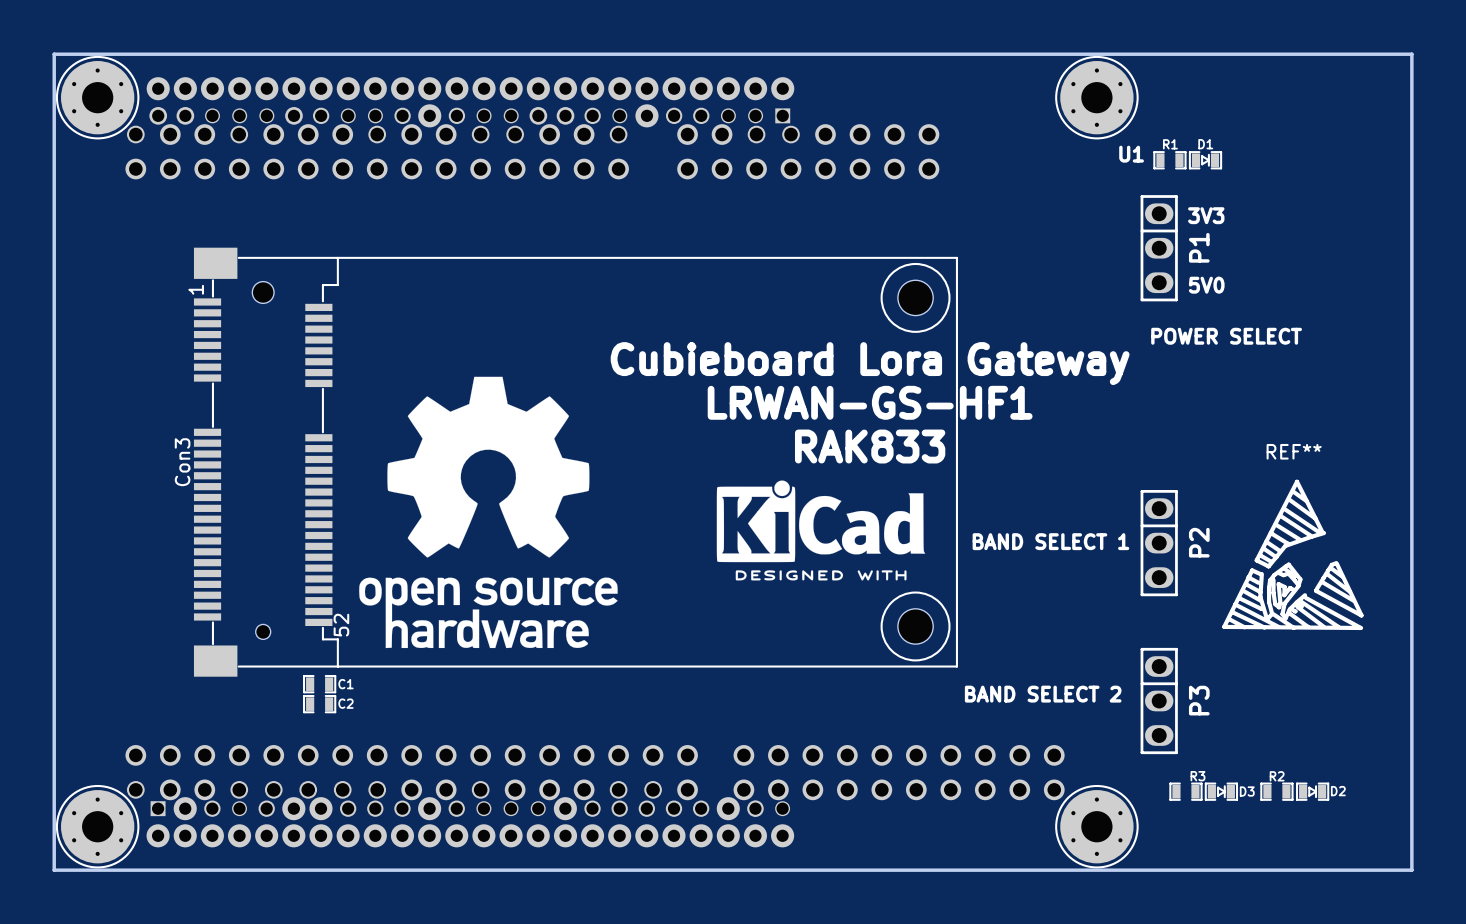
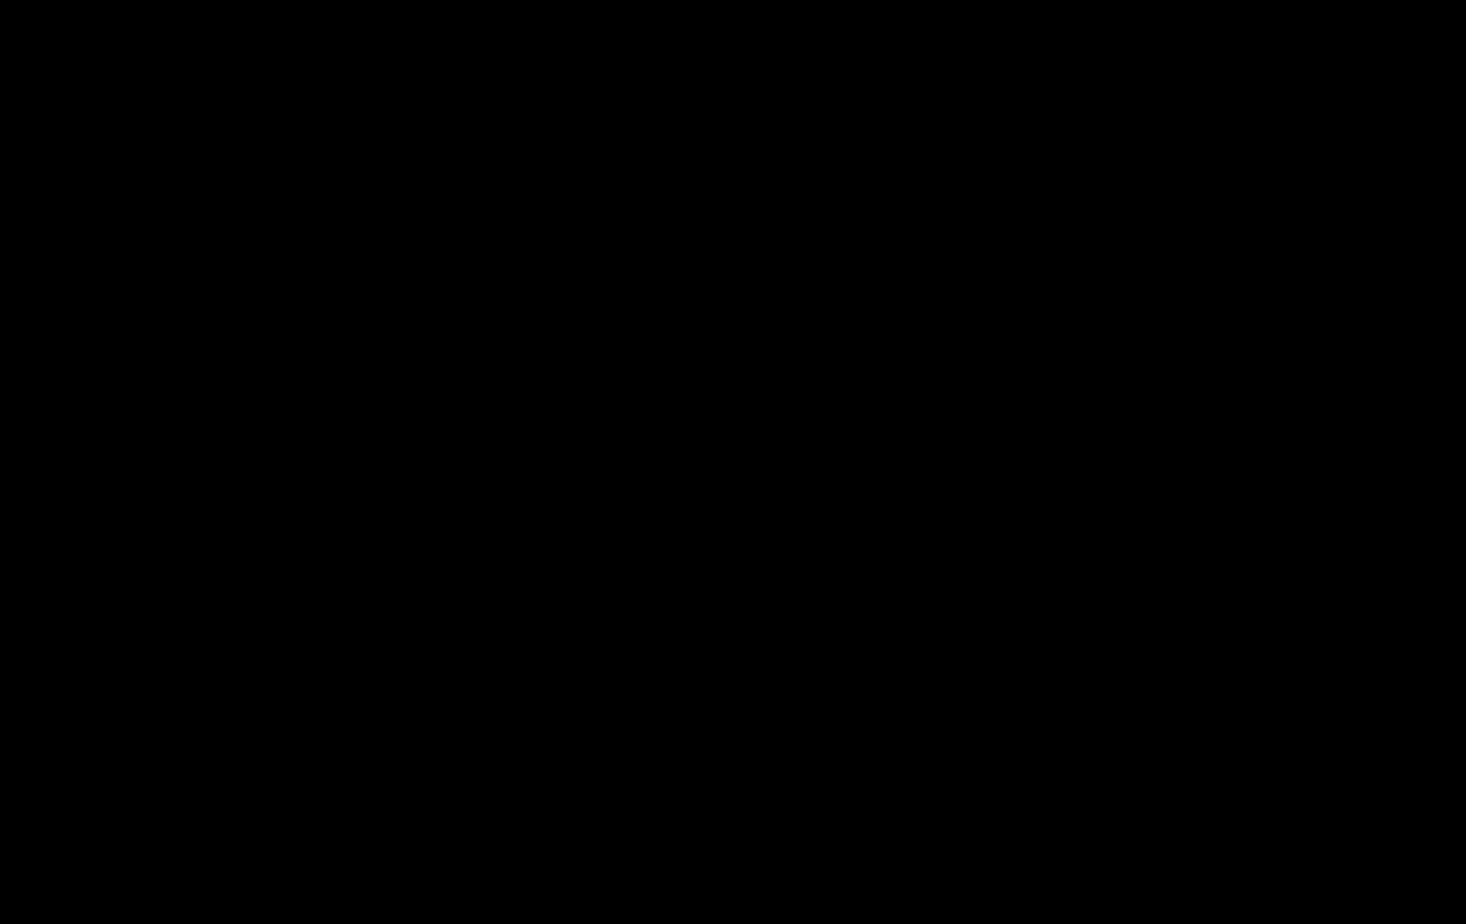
board edge: (54, 54) (1411, 54) (1411, 870) (54, 870) (54, 54) -> none
part: (97, 97) -> none
part: (1096, 97) -> none
part: (470, 102) -> none
R1: (1169, 160) -> none
D1: (1205, 160) -> none
text: 3V3 (1206, 215) -> none
P1: (1159, 248) -> none
text: 5V0 (1206, 285) -> none
text: POWER SELECT (1226, 336) -> none
text: Cubieboard Lora Gateway (870, 363) -> none
drawing: [359, 376, 618, 649] -> none
text: LRWAN-GS-HF1 (870, 402) -> none
text: RAK833 (870, 446) -> none
Con3: (575, 462) -> none
U1: (595, 462) -> none
drawing: [716, 480, 926, 581] -> none
text: BAND SELECT 1 (1050, 541) -> none
P2: (1159, 543) -> none
REF**: (1292, 554) -> none
C1: (319, 684) -> none
text: BAND SELECT 2 (1043, 694) -> none
P3: (1159, 701) -> none
C2: (319, 704) -> none
R3: (1185, 791) -> none
D3: (1221, 791) -> none
R2: (1276, 791) -> none
D2: (1312, 791) -> none
part: (470, 822) -> none
part: (97, 826) -> none
part: (1096, 826) -> none

